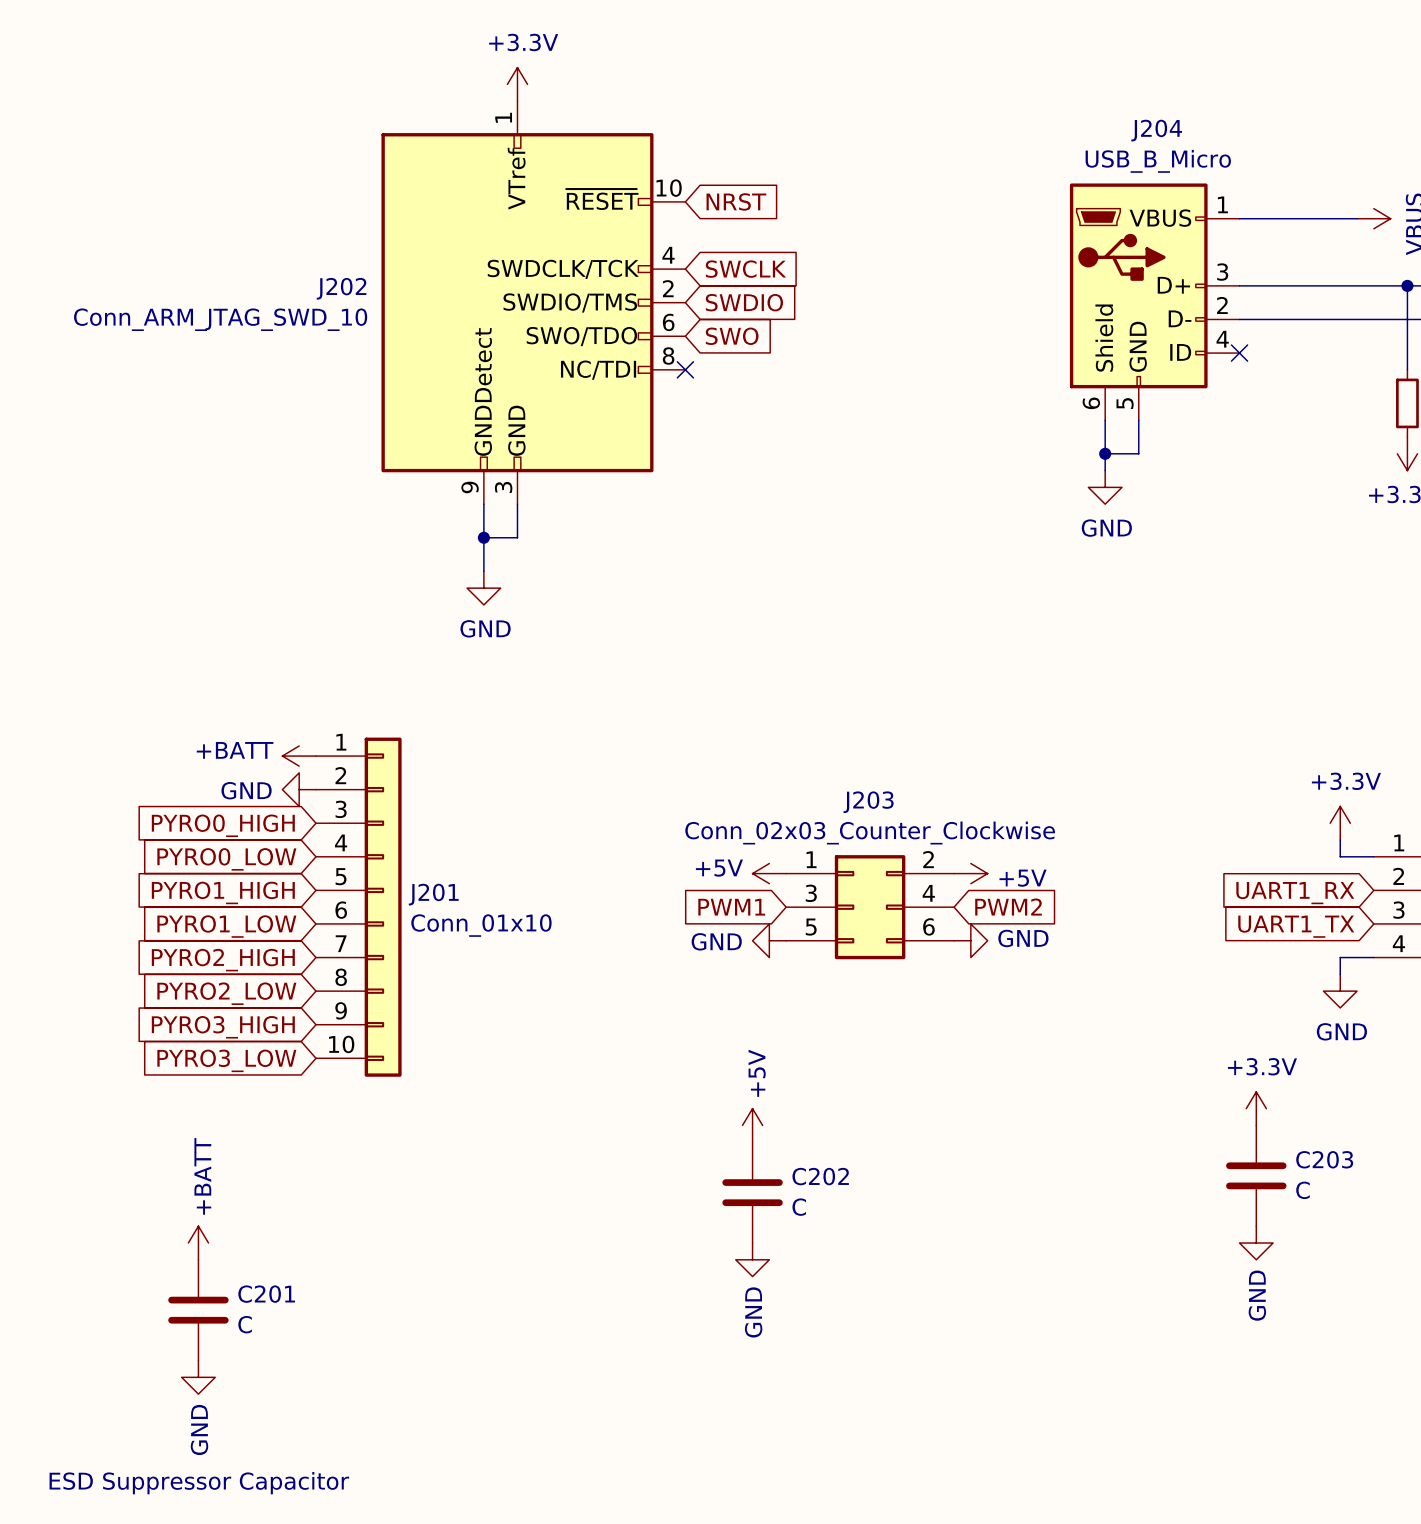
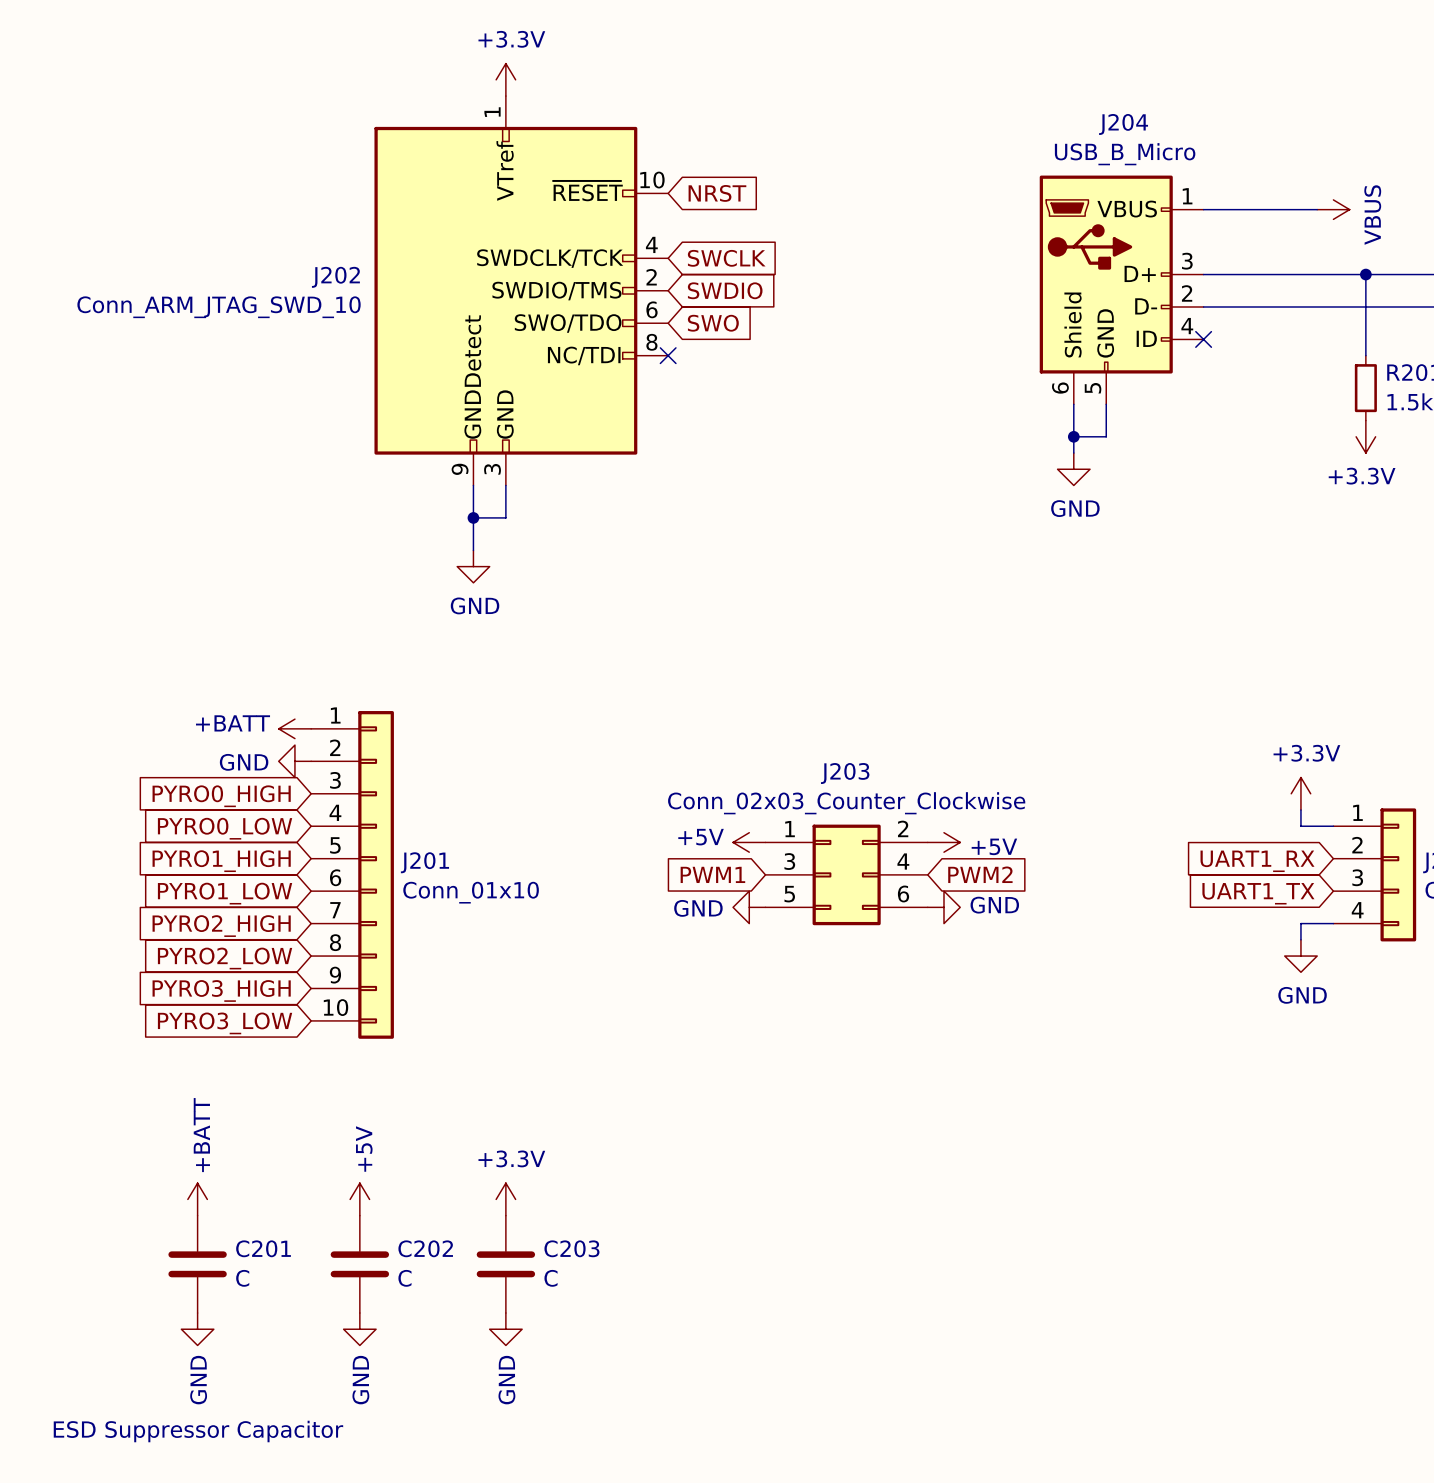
power symbol: +3.3V (1256, 1108) -> none
power symbol: +5V (752, 1125) -> none
C203 position: (1256, 1175) -> (505, 1264)
C202 position: (752, 1192) -> (359, 1264)
power symbol: none -> +5V (359, 1199)
power symbol: none -> +3.3V (505, 1199)
power symbol: GND (1256, 1243) -> none
power symbol: GND (752, 1259) -> none
power symbol: none -> GND (359, 1329)
power symbol: none -> GND (505, 1329)

